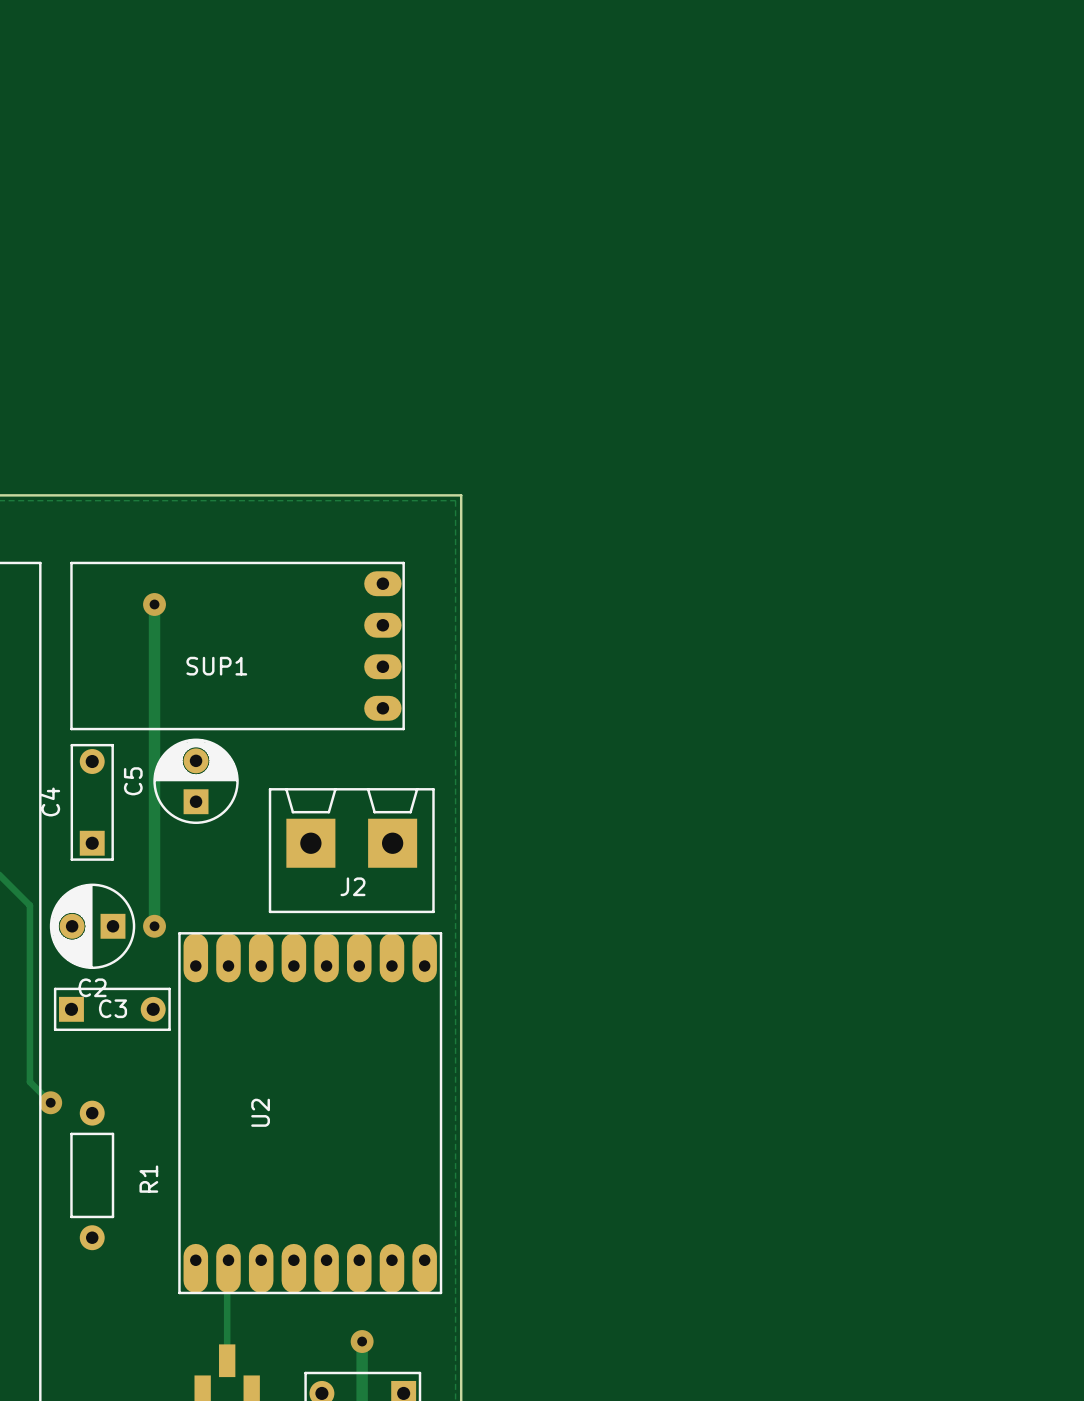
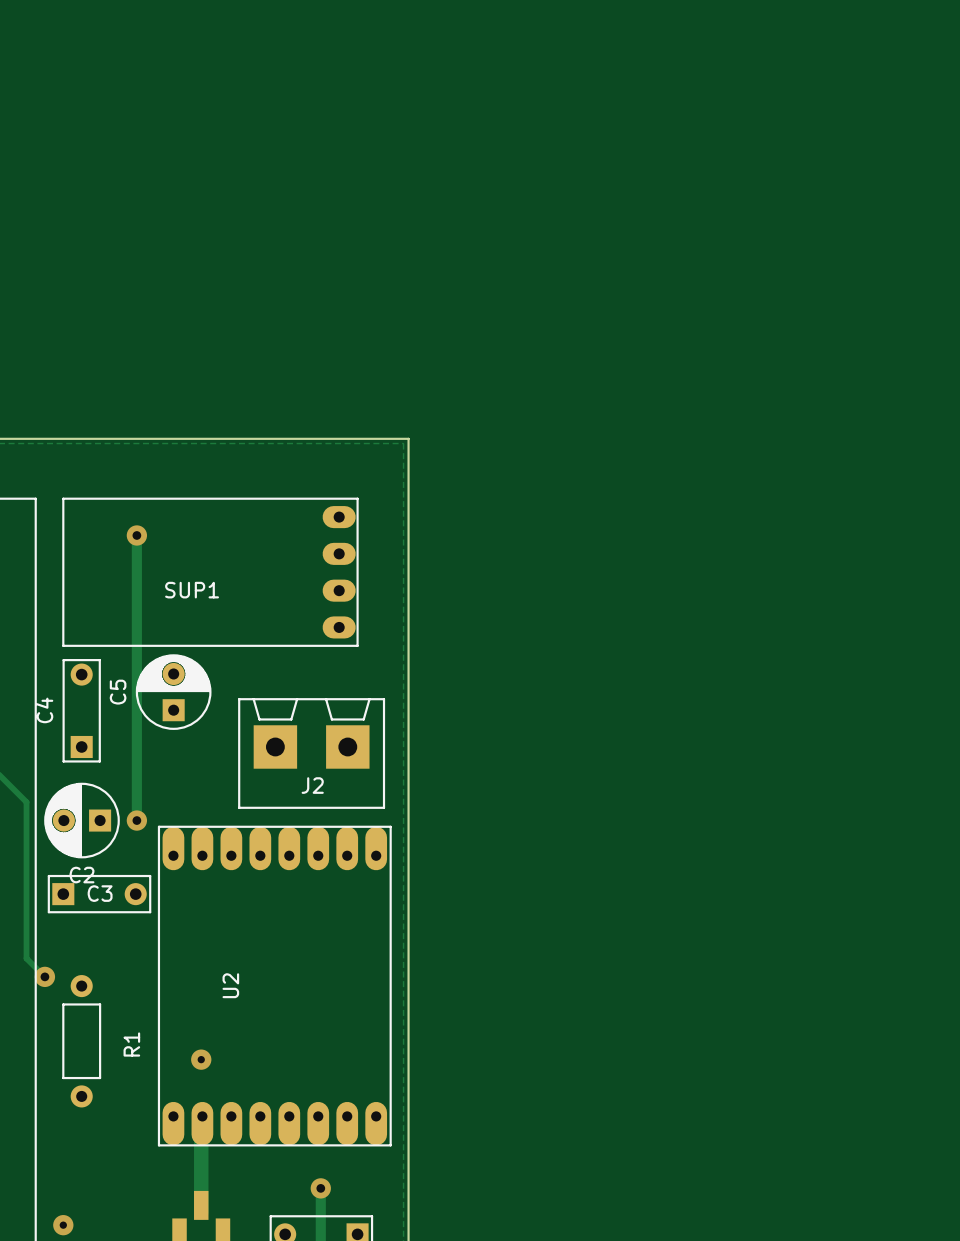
via: none -> (201, 1059)
track width: thin (228, 1260) (227, 1368) -> thick (202, 1116) (201, 1212)
via: none -> (63, 1225)

